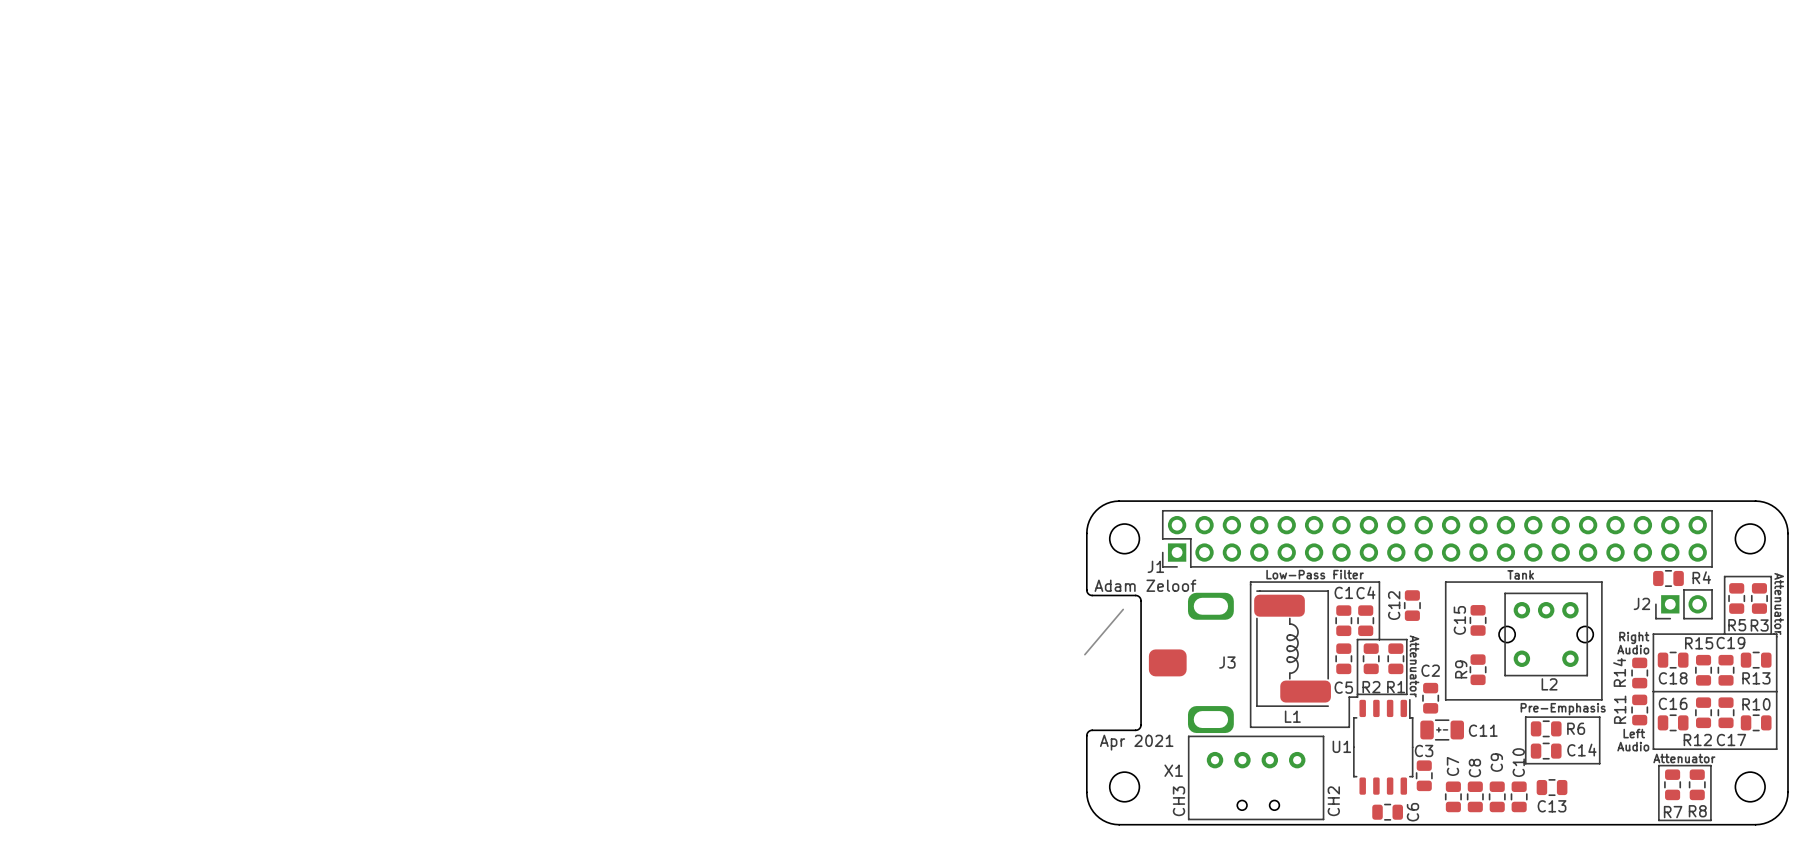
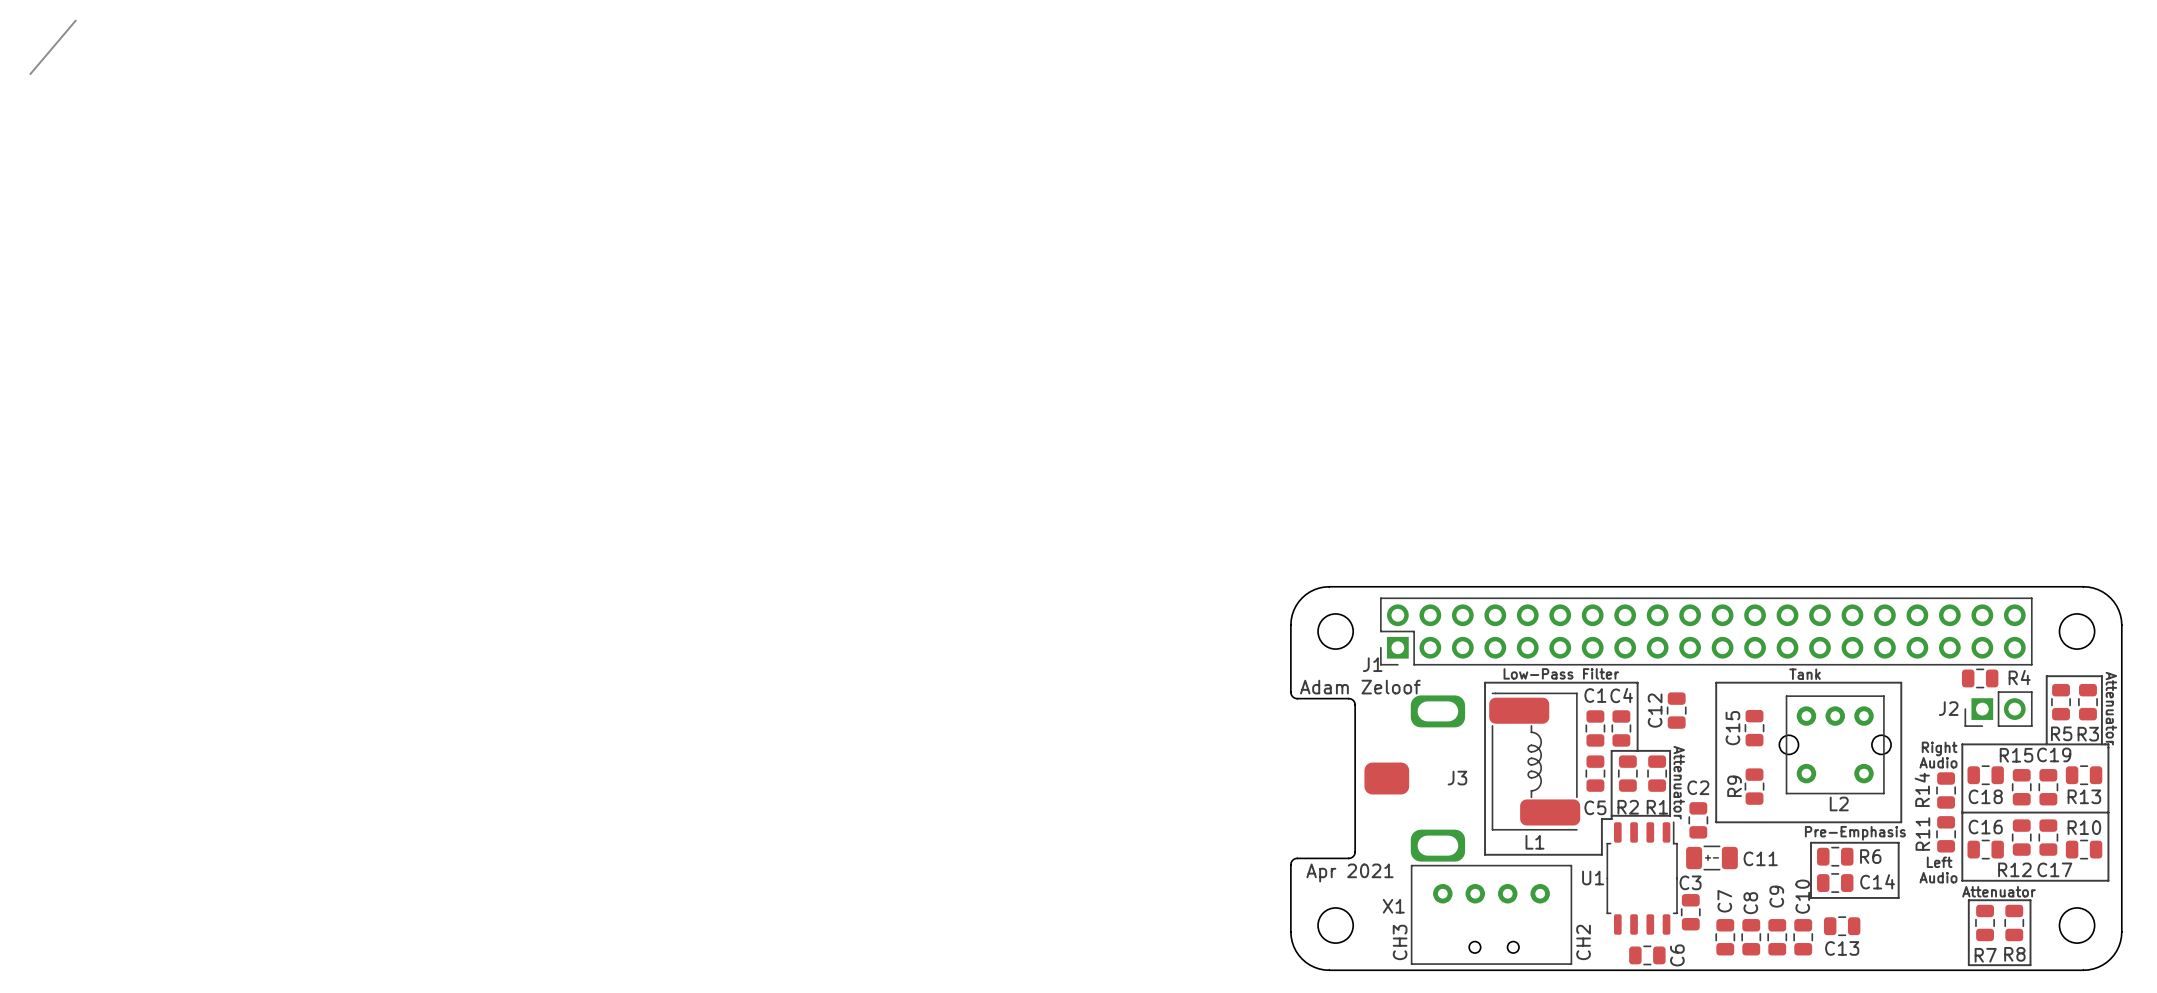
line: none -> (75, 20) (30, 74)
line: (1123, 609) (1084, 654) -> none

